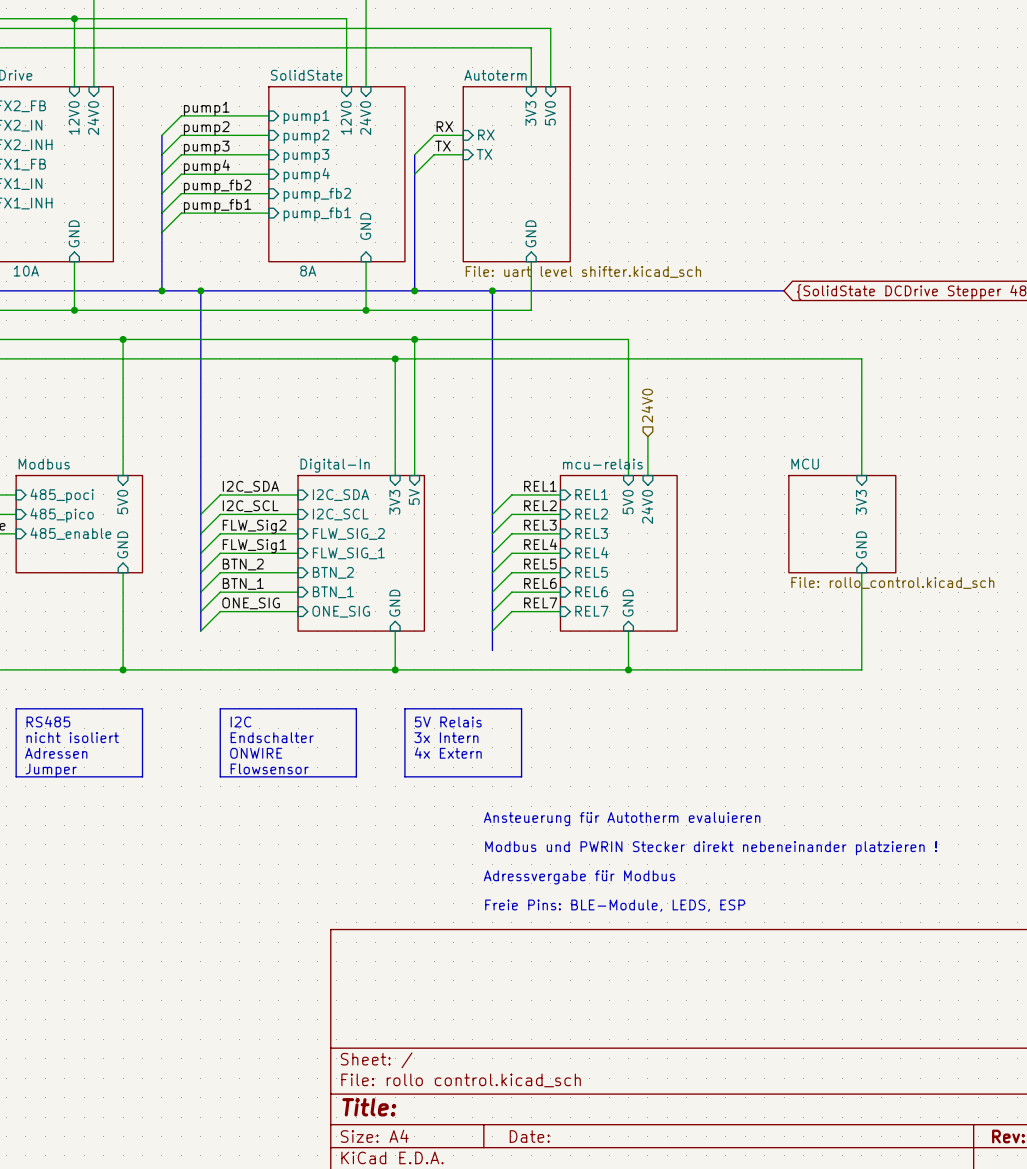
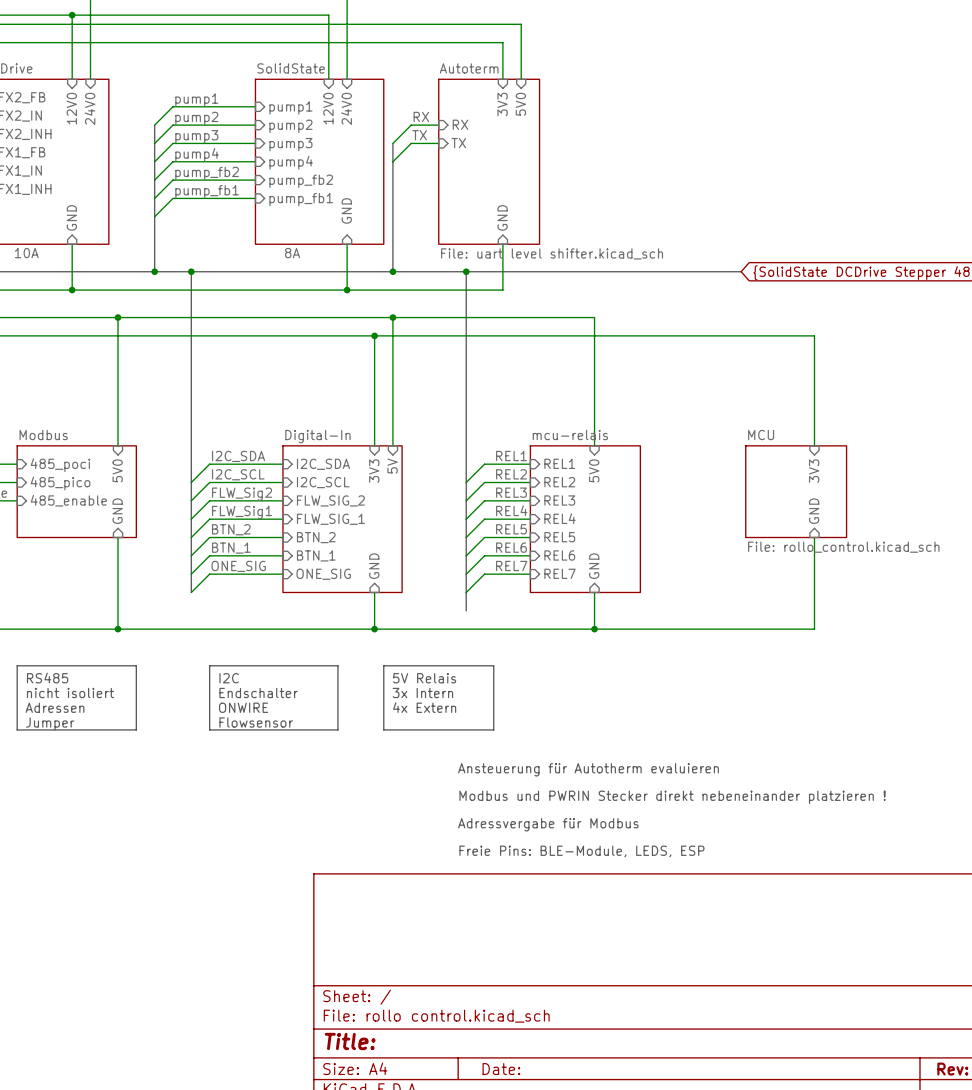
hierarchical label: 24V0 (647, 405) -> none
wire: (647, 436) (647, 475) -> none
sheet pin: 24V0 (647, 506) -> none

